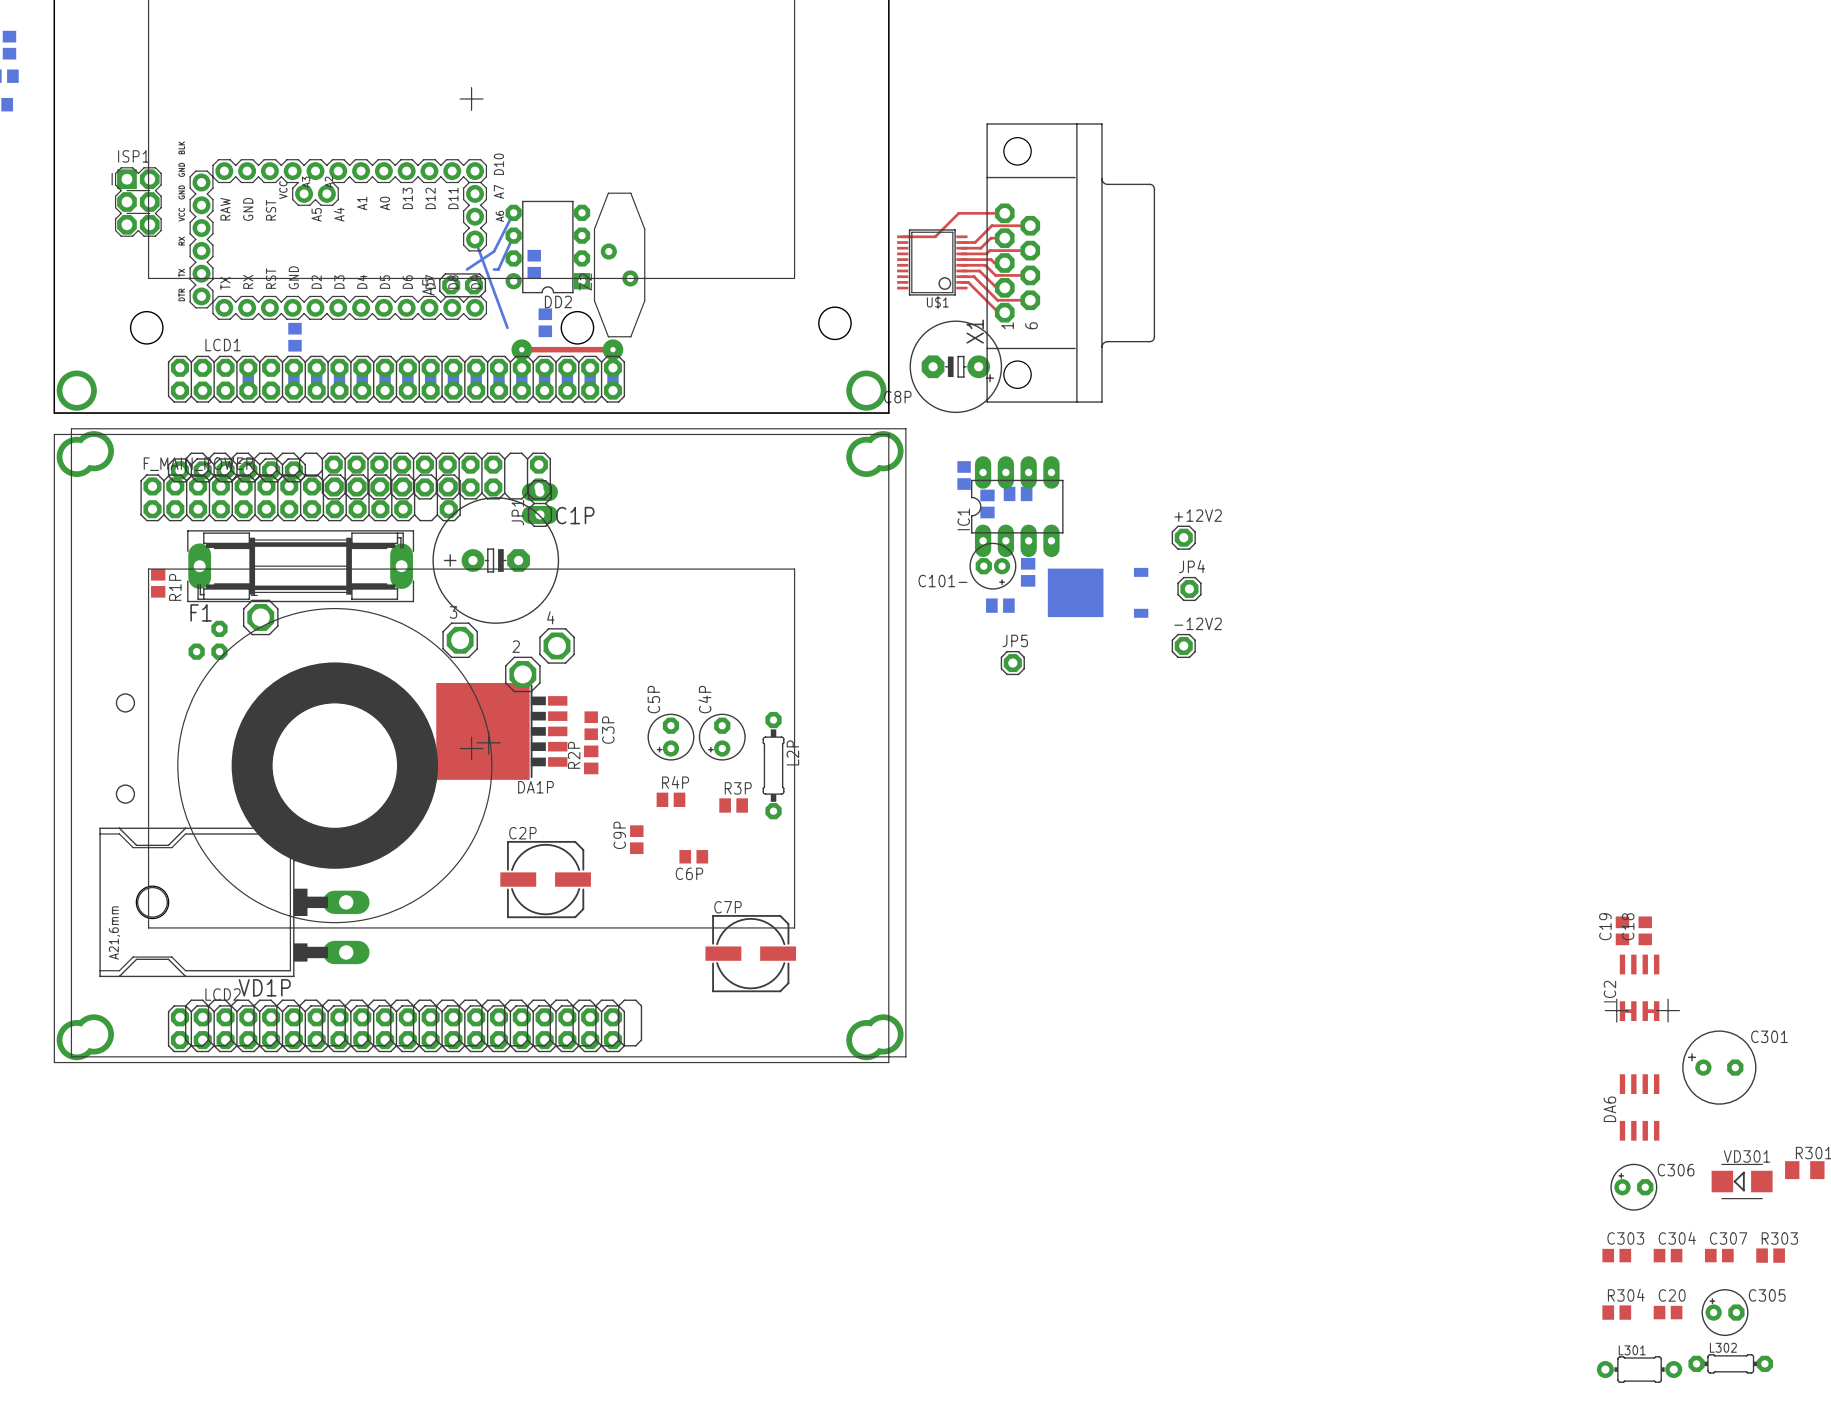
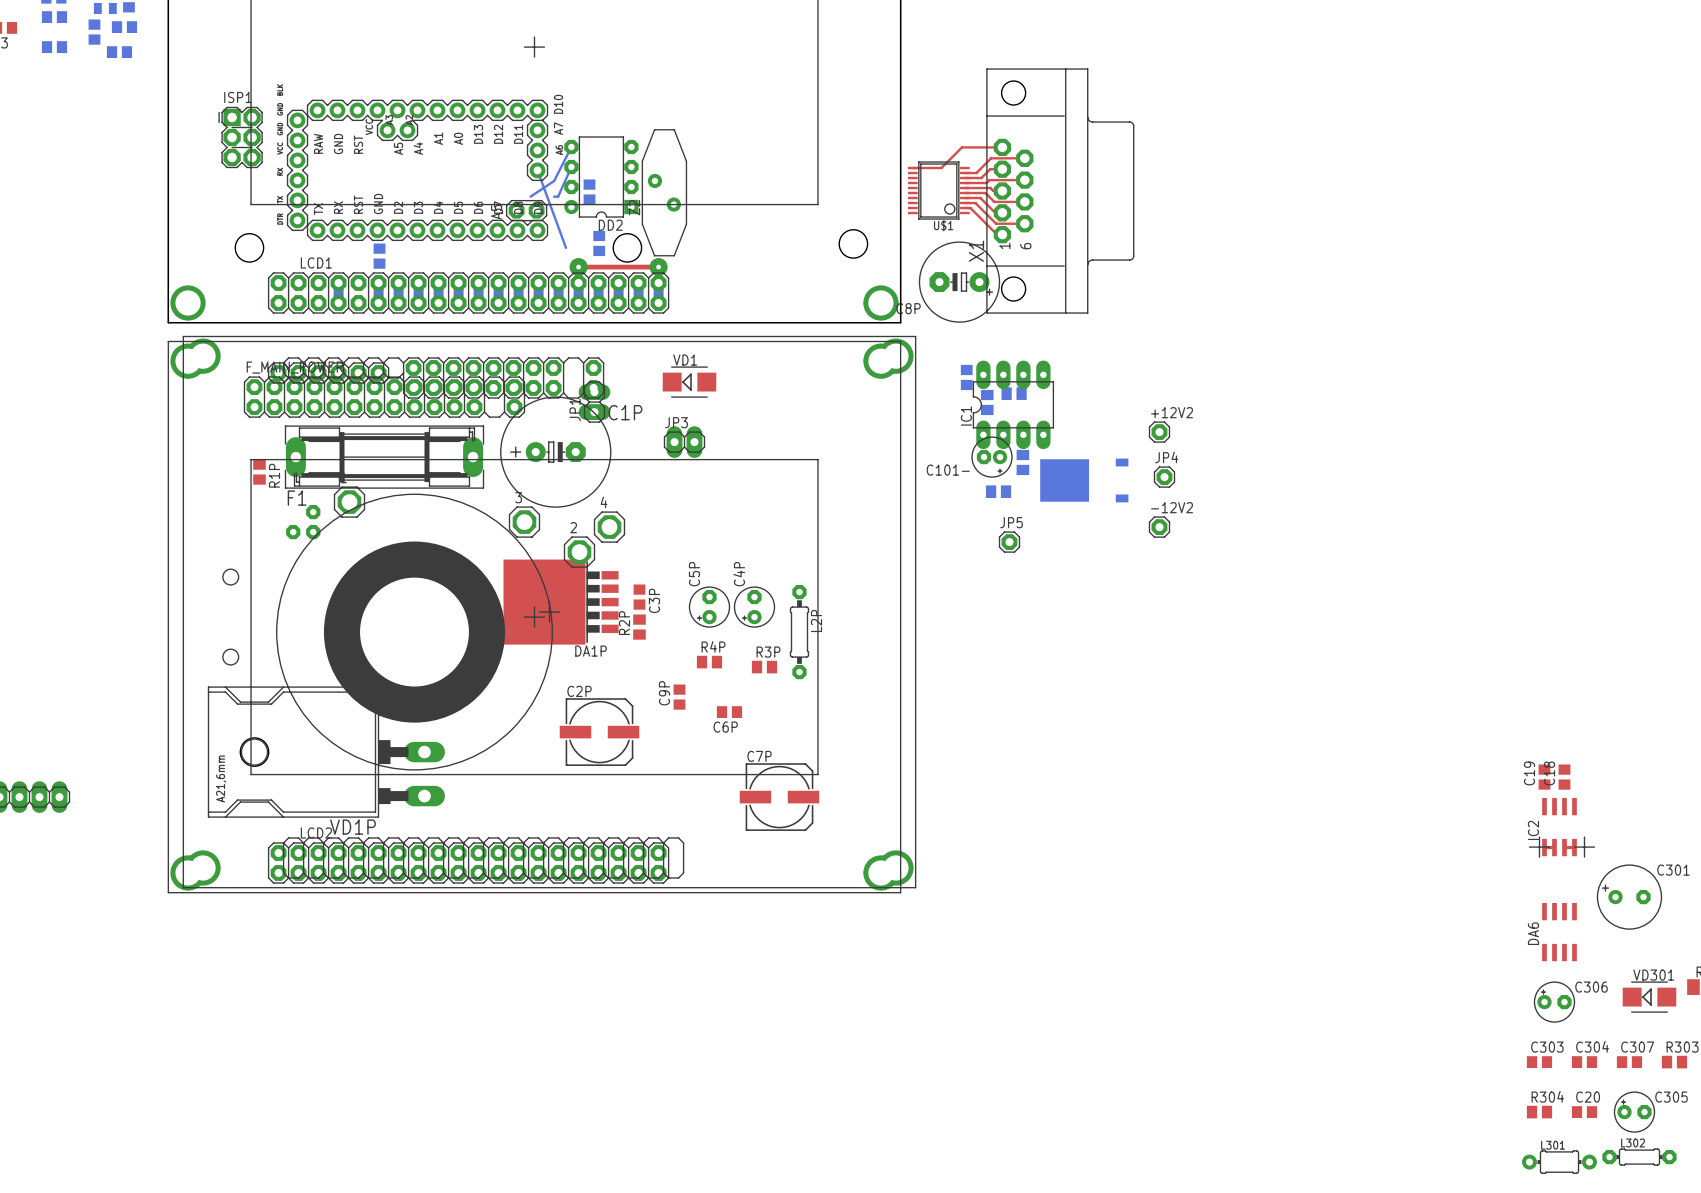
VD1: none -> (689, 382)
JP3: none -> (684, 442)

